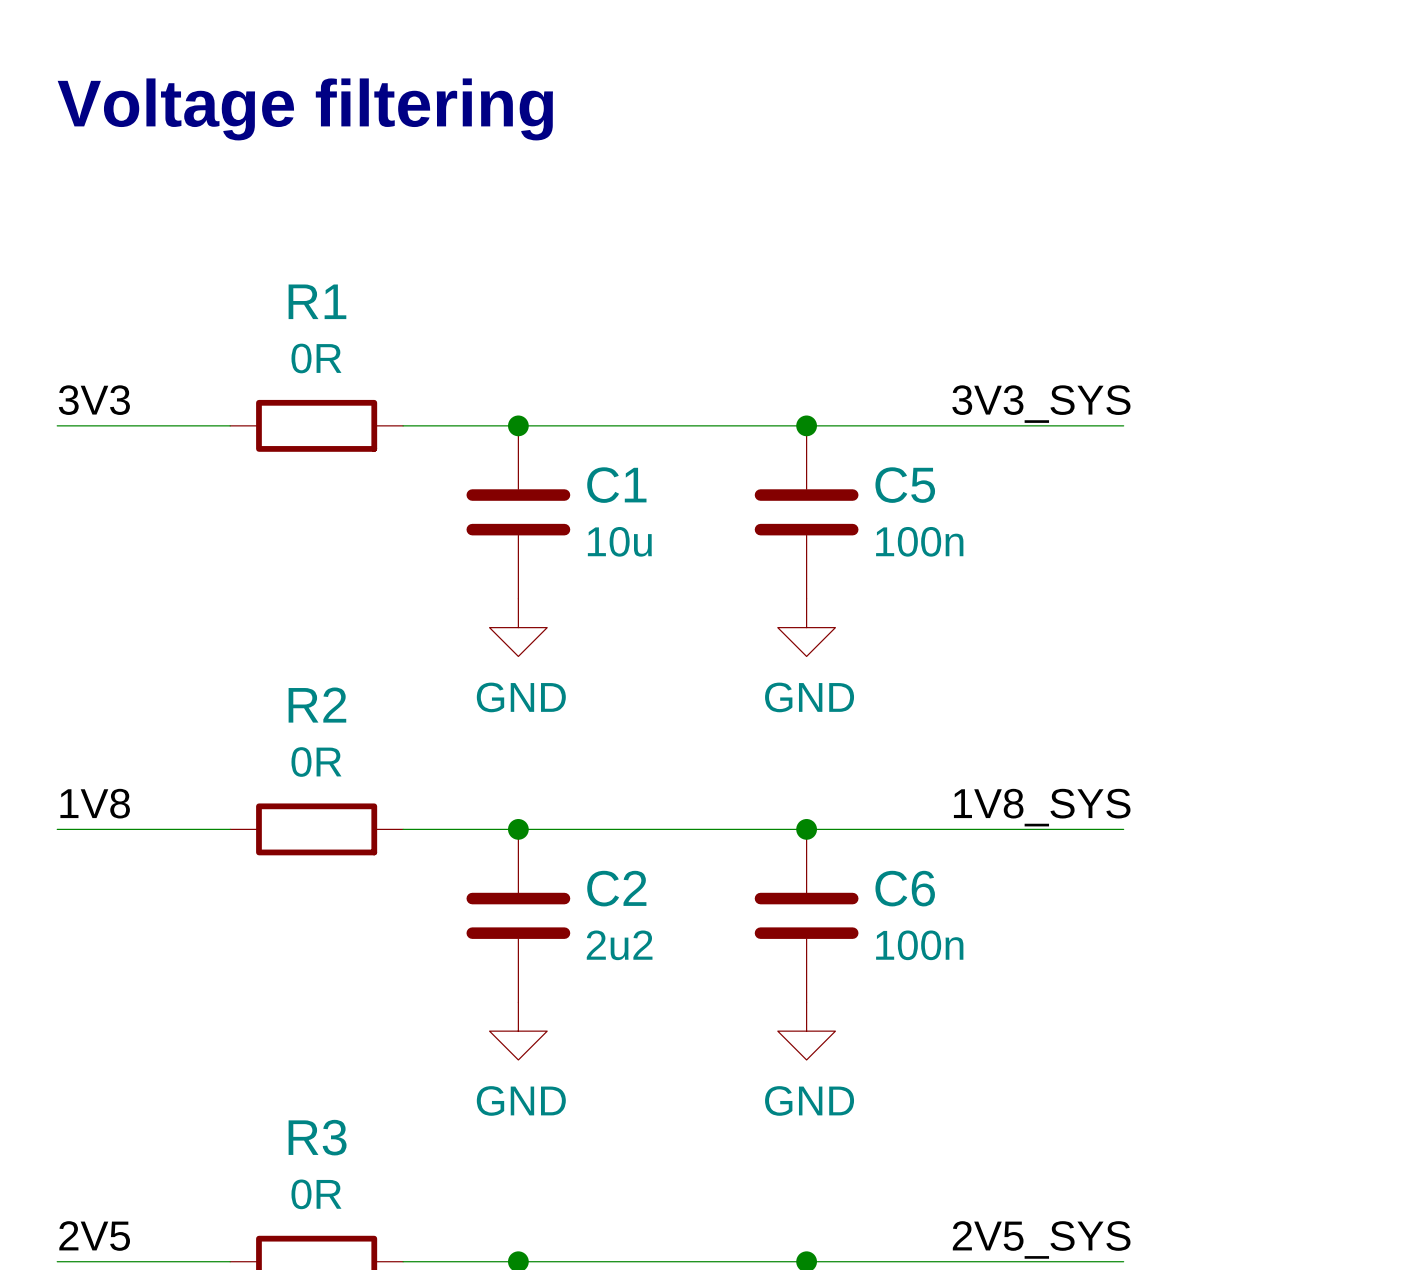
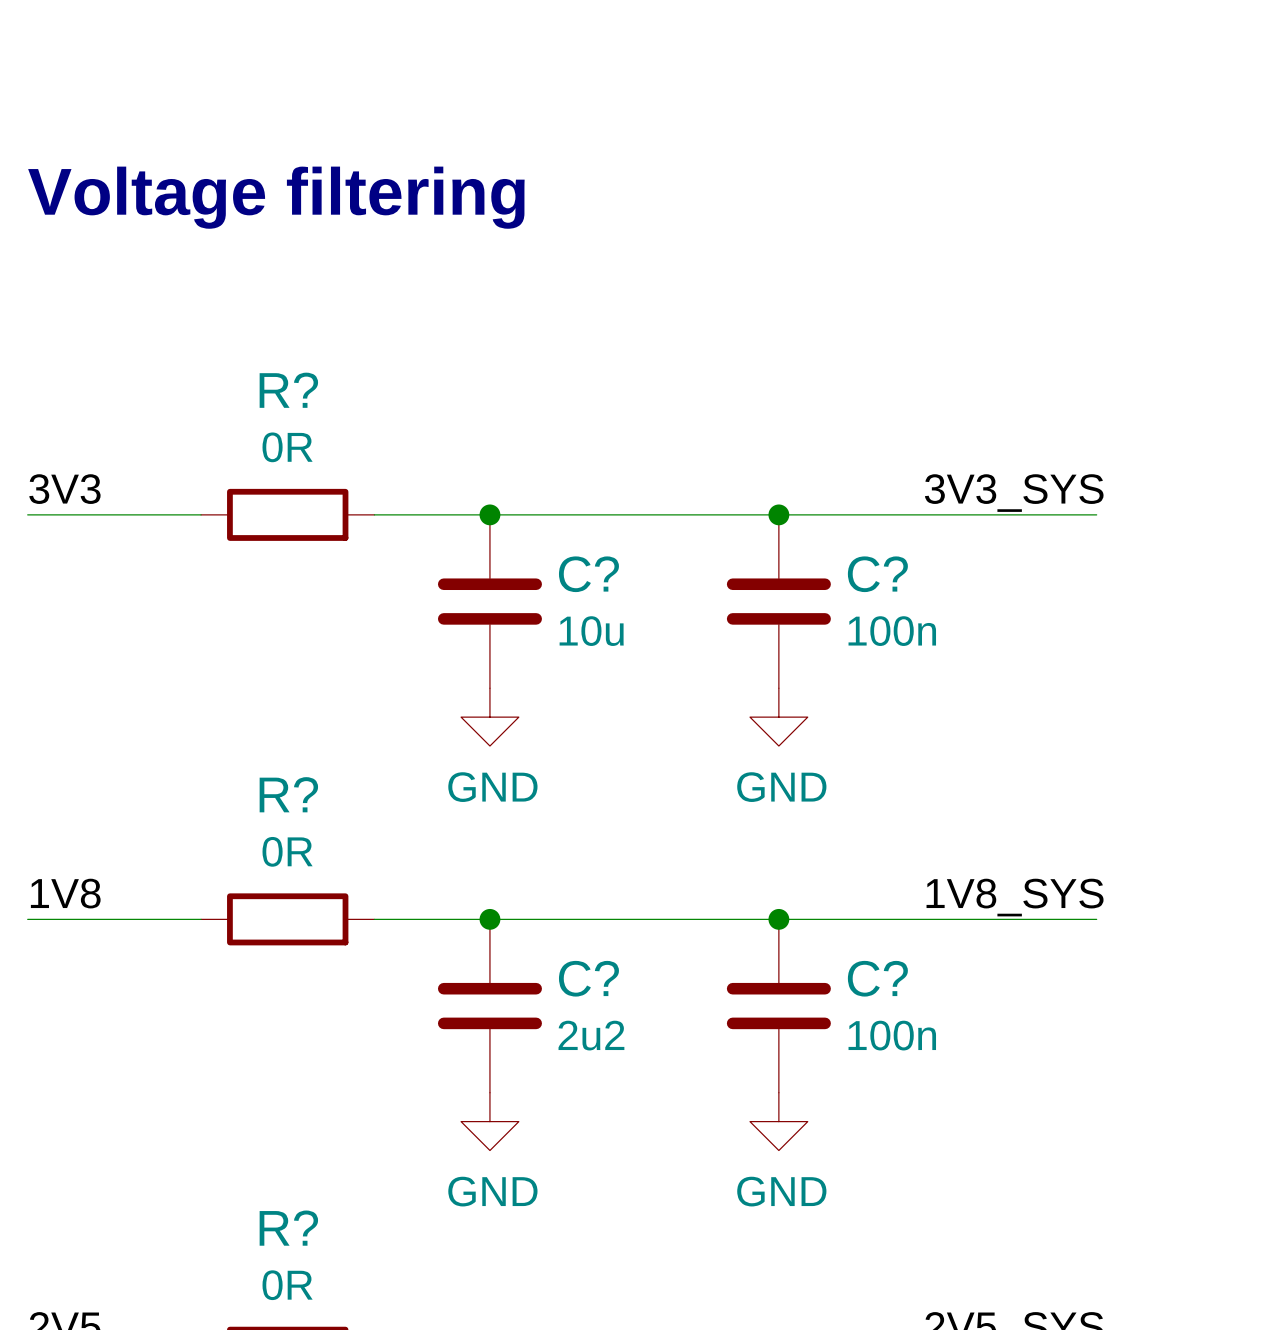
R1 name: R1 (317, 301) -> R? (288, 390)
C1 name: C1 (616, 485) -> C? (588, 574)
C5 name: C5 (905, 485) -> C? (877, 574)
R2 name: R2 (317, 705) -> R? (288, 794)
C2 name: C2 (616, 888) -> C? (588, 978)
C6 name: C6 (905, 888) -> C? (877, 978)
R3 name: R3 (317, 1137) -> R? (288, 1228)

